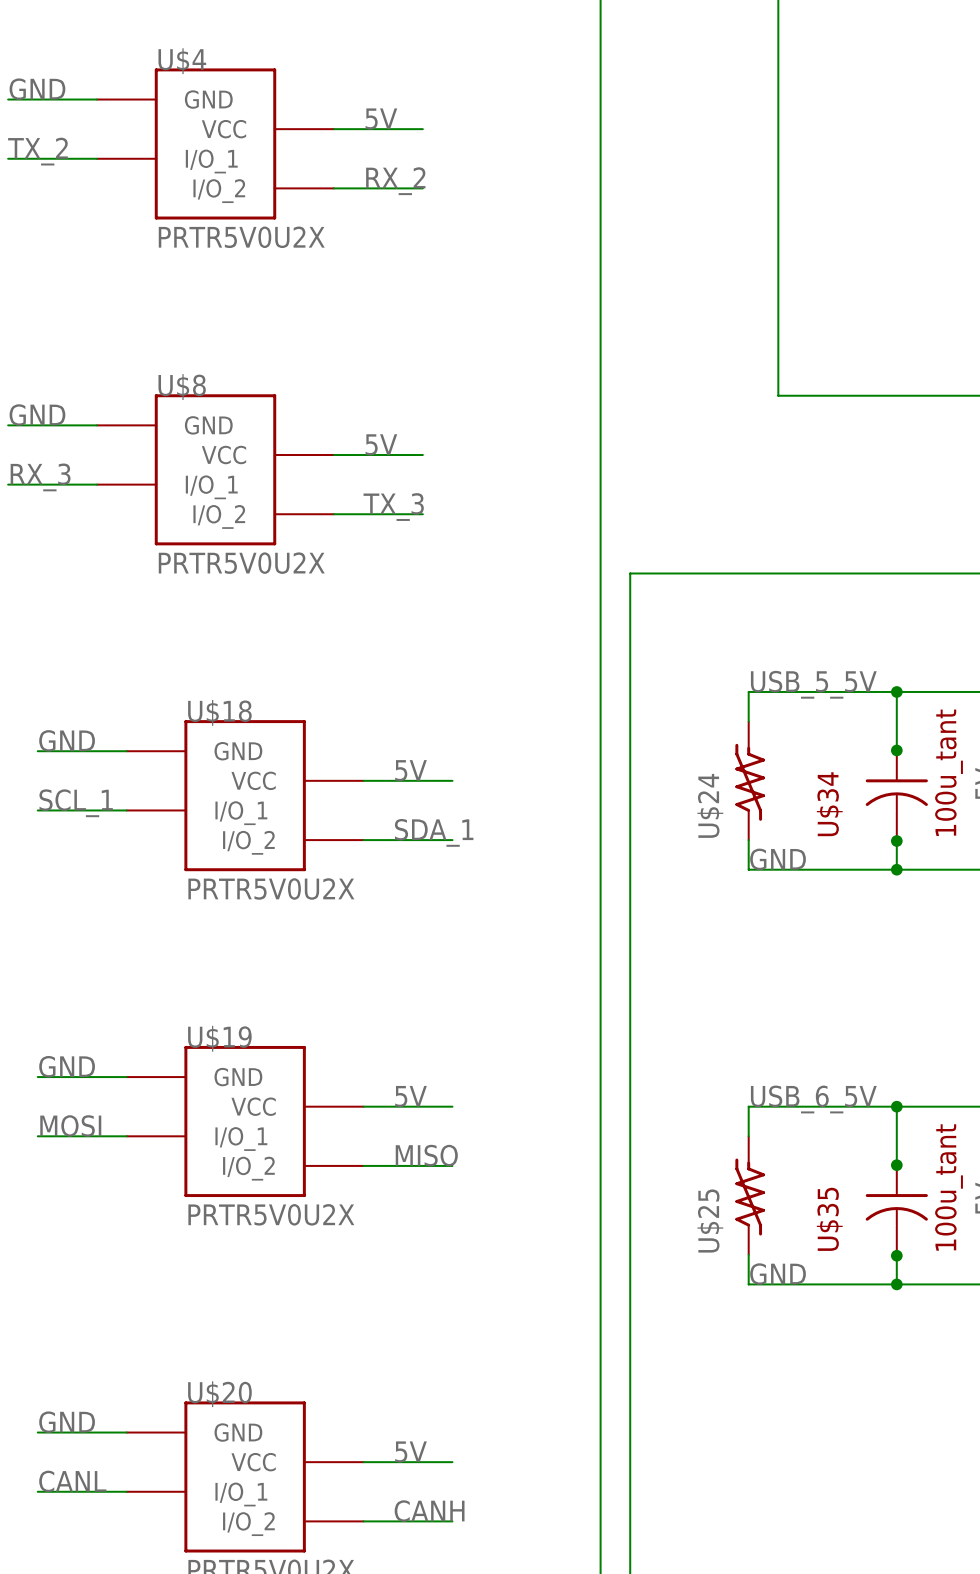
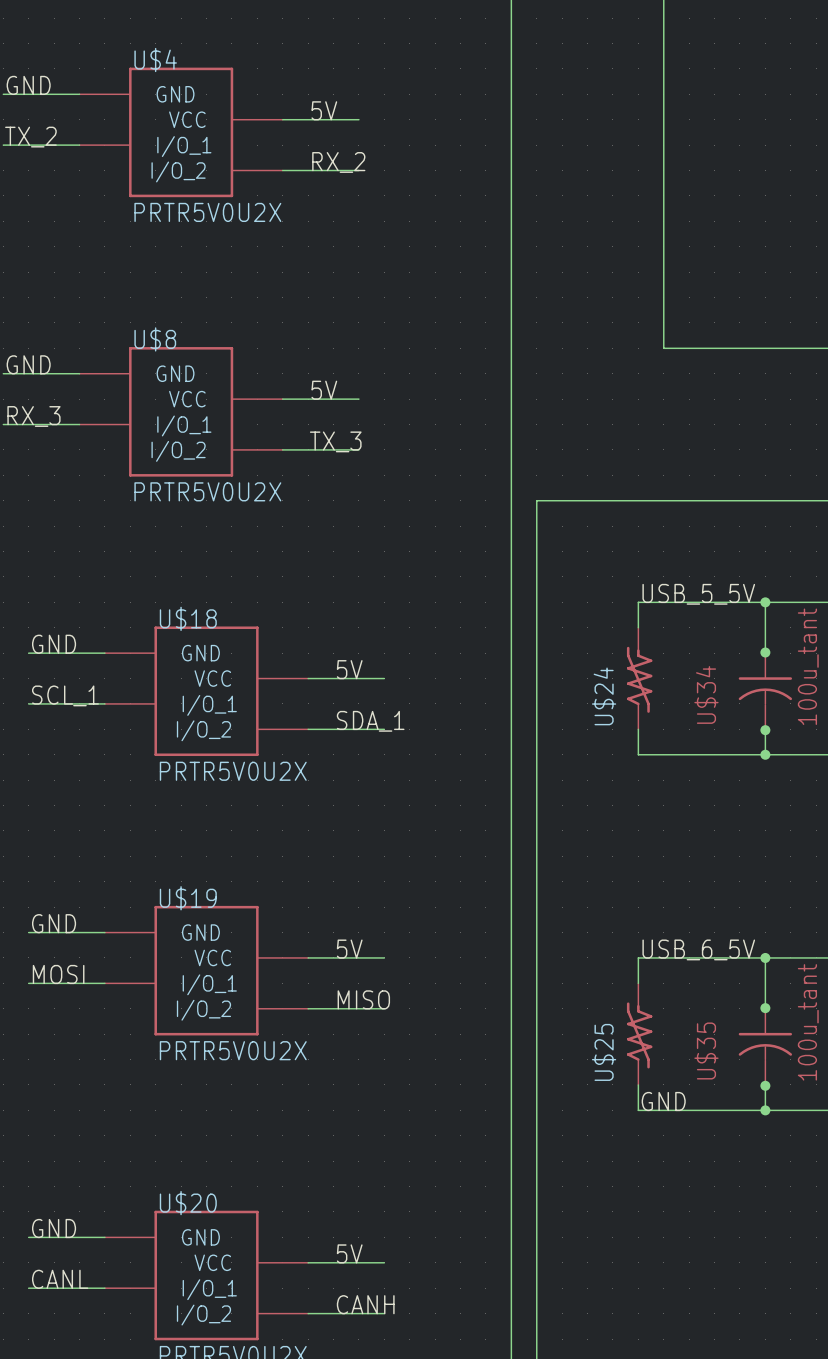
label: GND (778, 859) -> none

